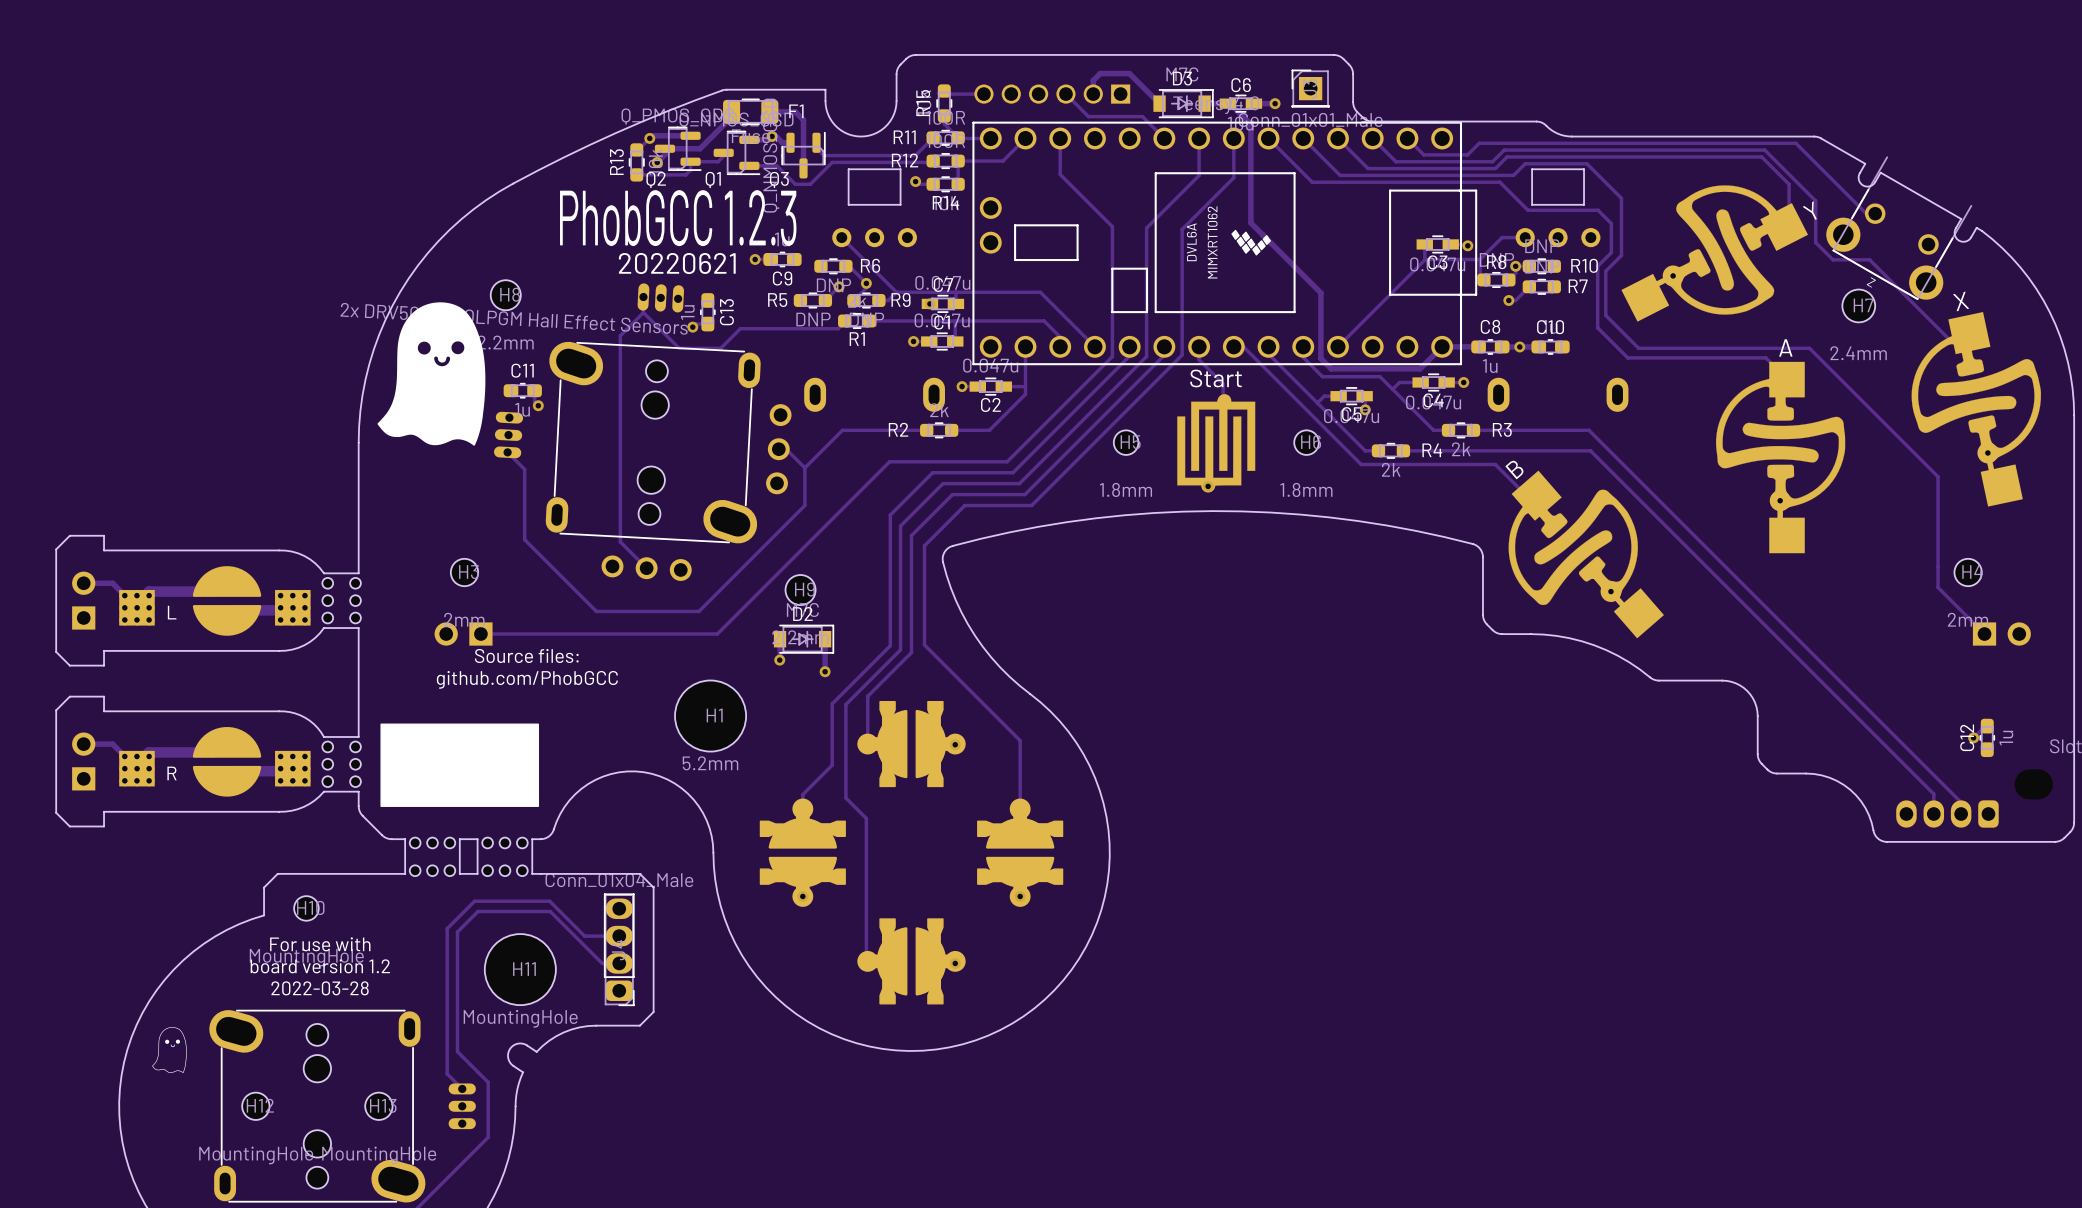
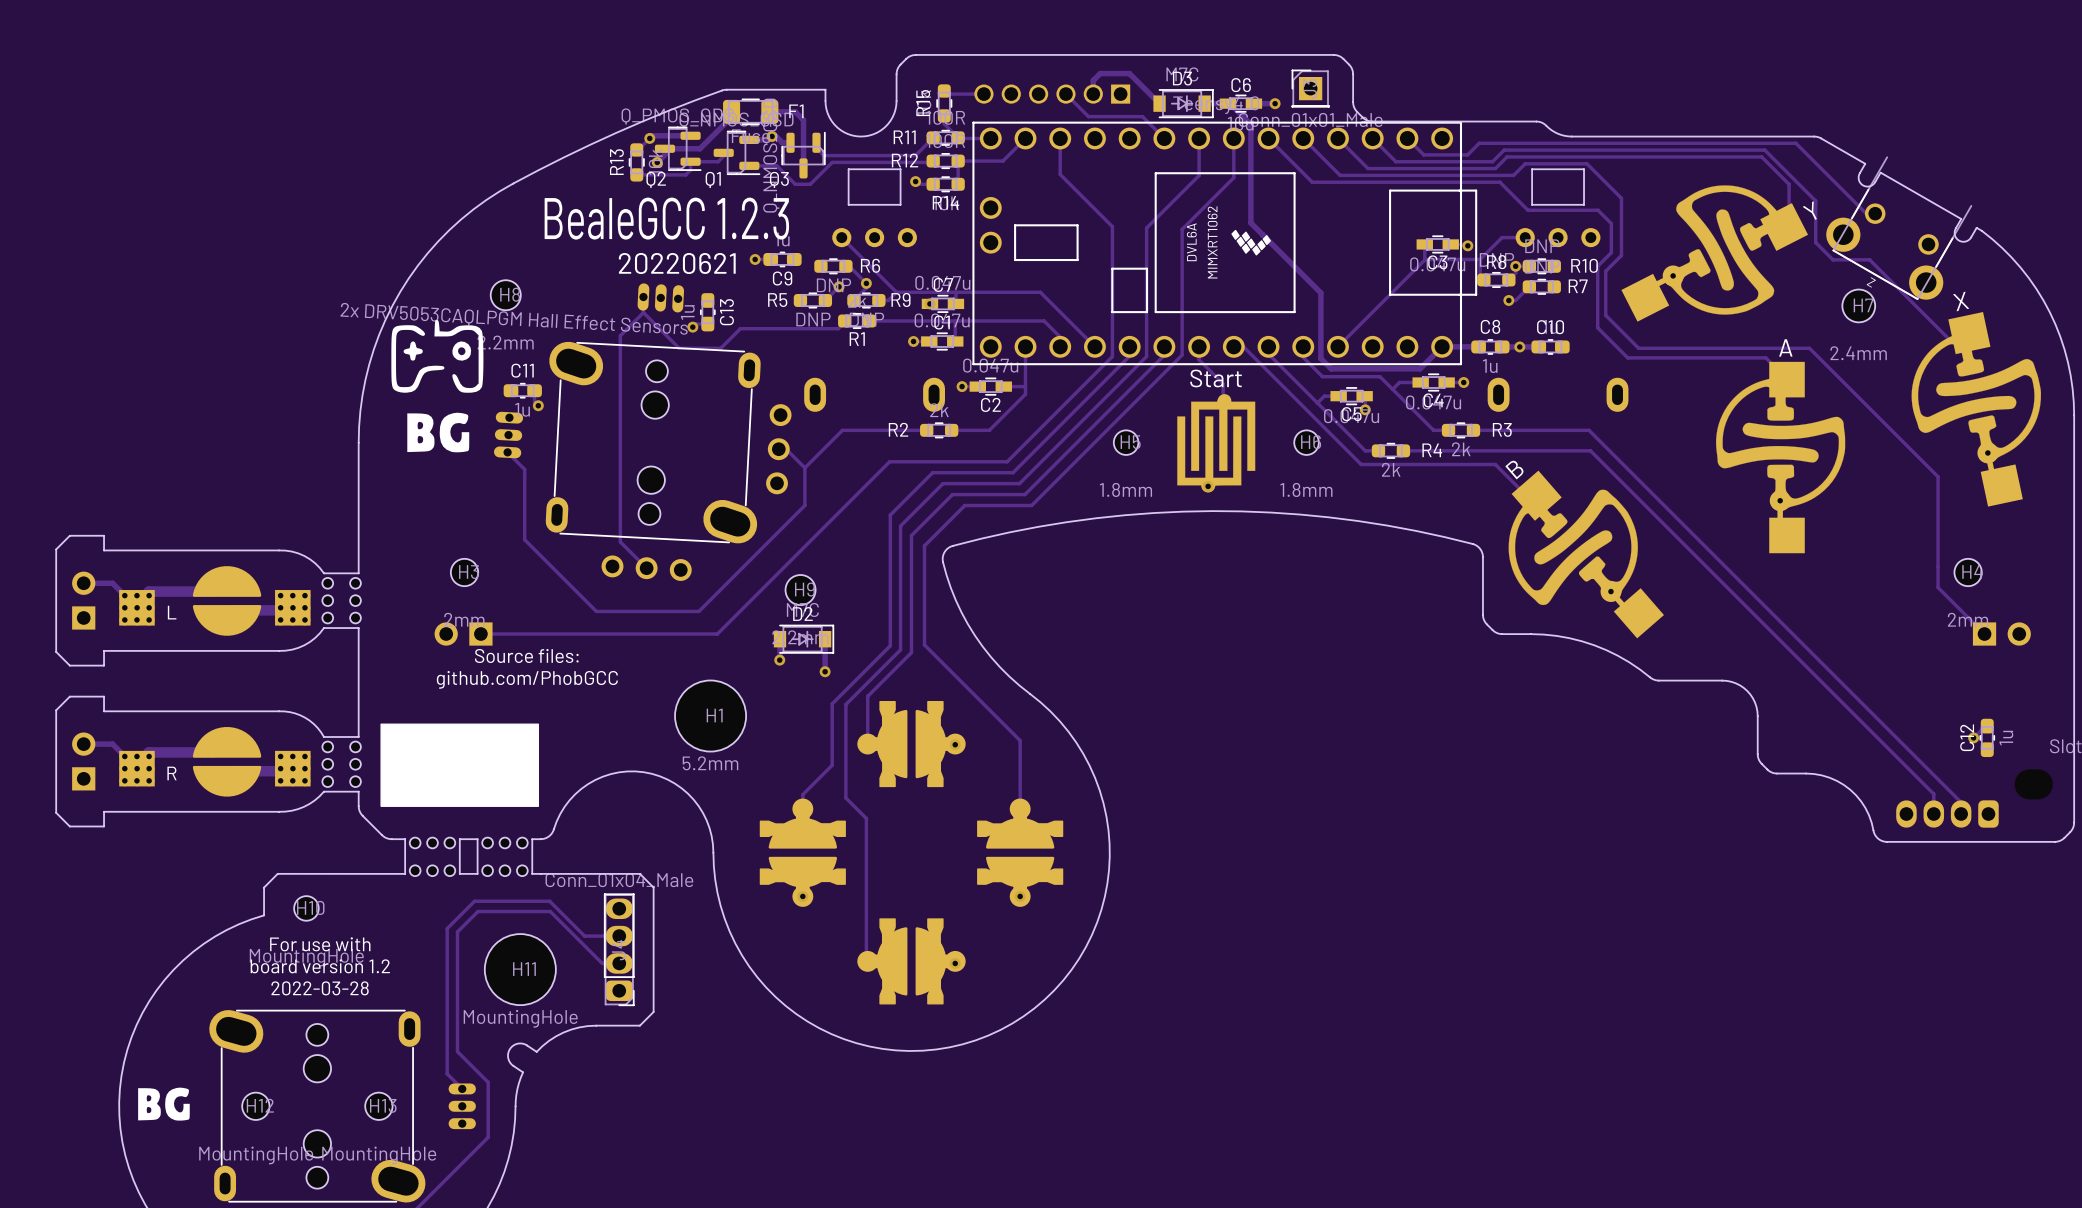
text: PhobGCC 1.2.3 (678, 218) -> BealeGCC 1.2.3 (666, 218)
drawing shape: [377, 302, 486, 446] -> [391, 320, 484, 453]
drawing: [152, 1027, 187, 1074] -> none
drawing: none -> [138, 1087, 190, 1121]

